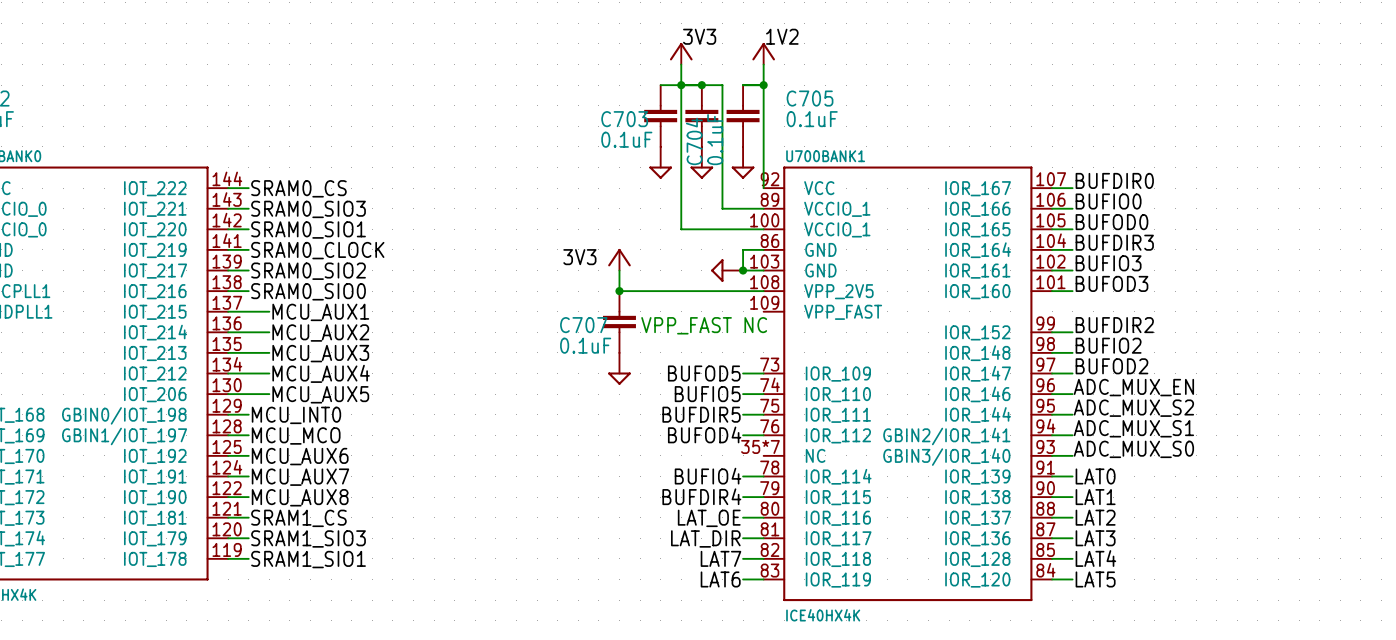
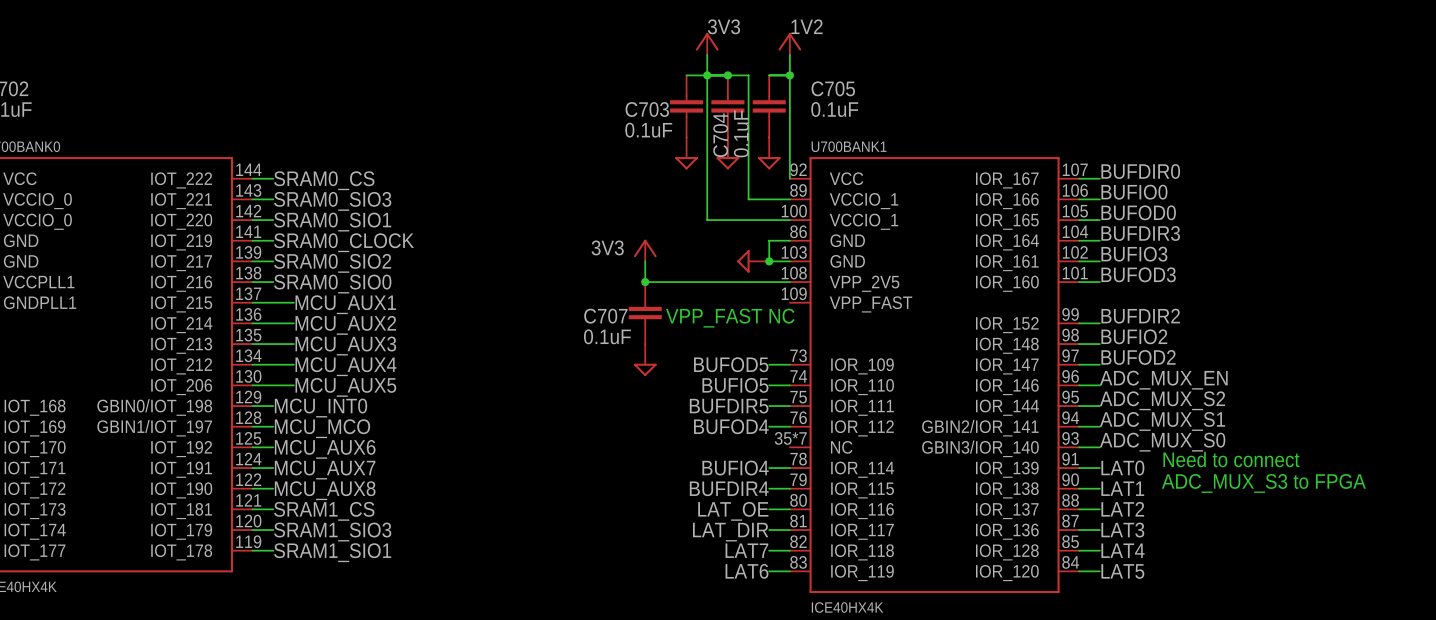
text: none -> Need to connect (1231, 459)
text: none -> ADC_MUX_S3 to FPGA (1263, 483)

